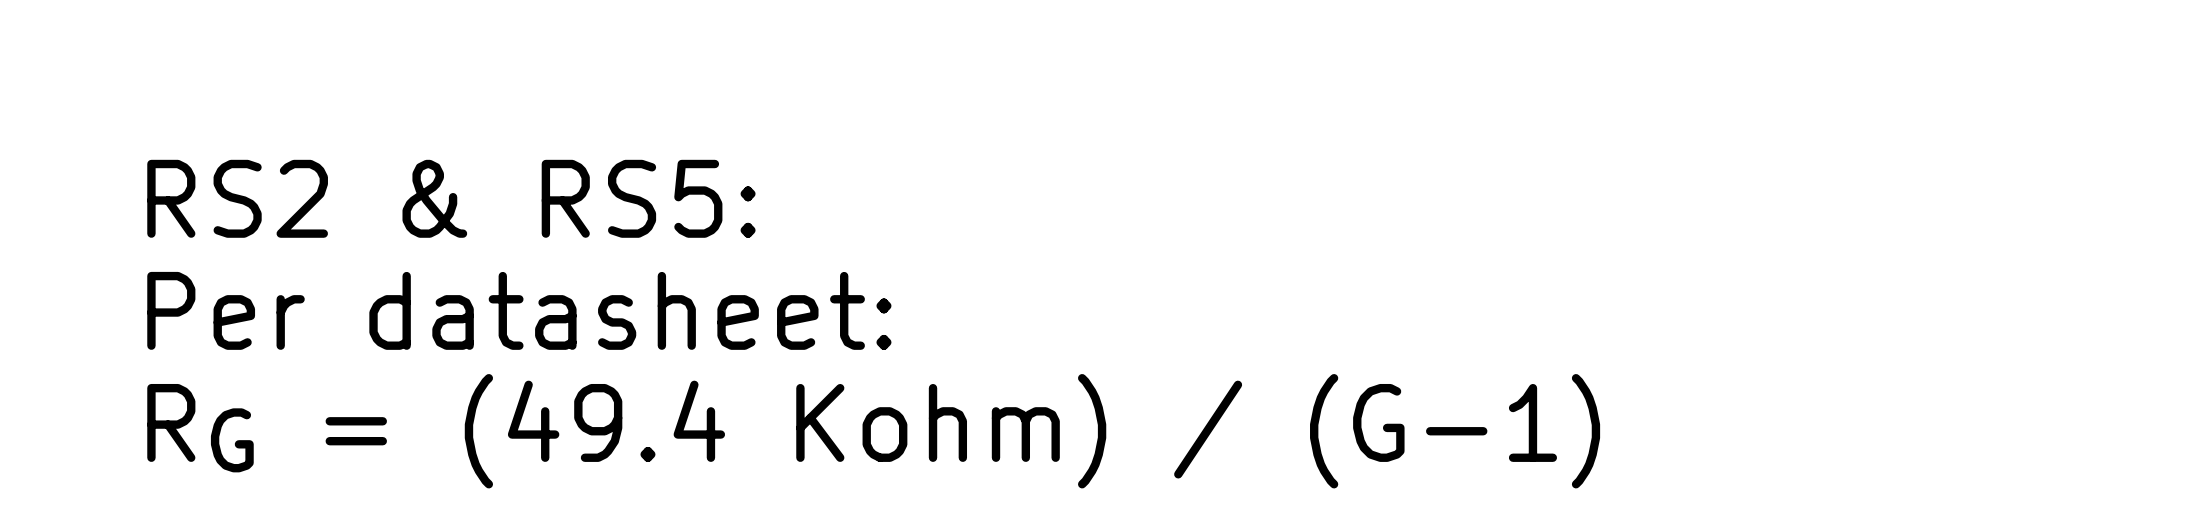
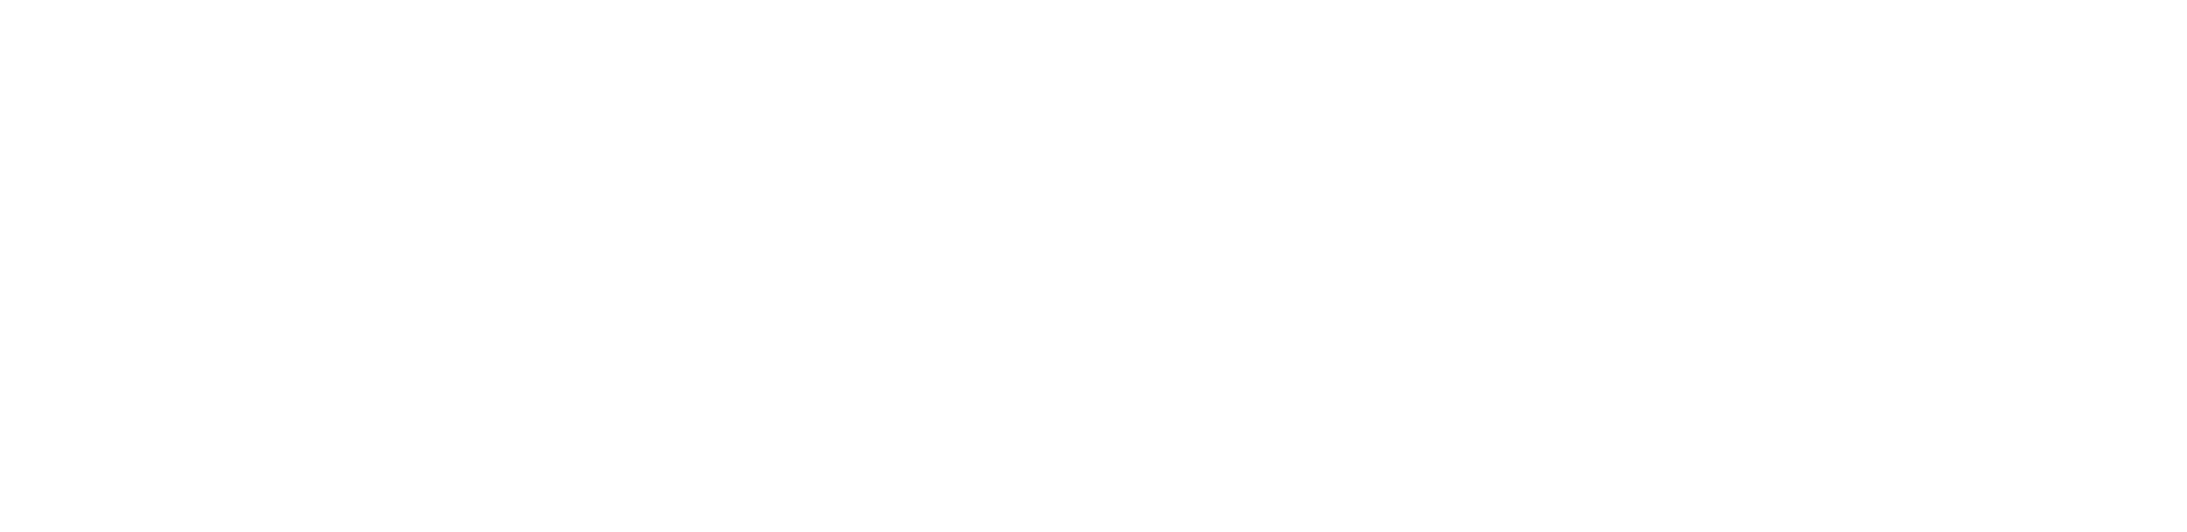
text: RS2 & RS5: (451, 198) -> none
text: Per datasheet: (519, 310) -> none
text: RG = (49.4 Kohm) / (G-1) (873, 431) -> none

